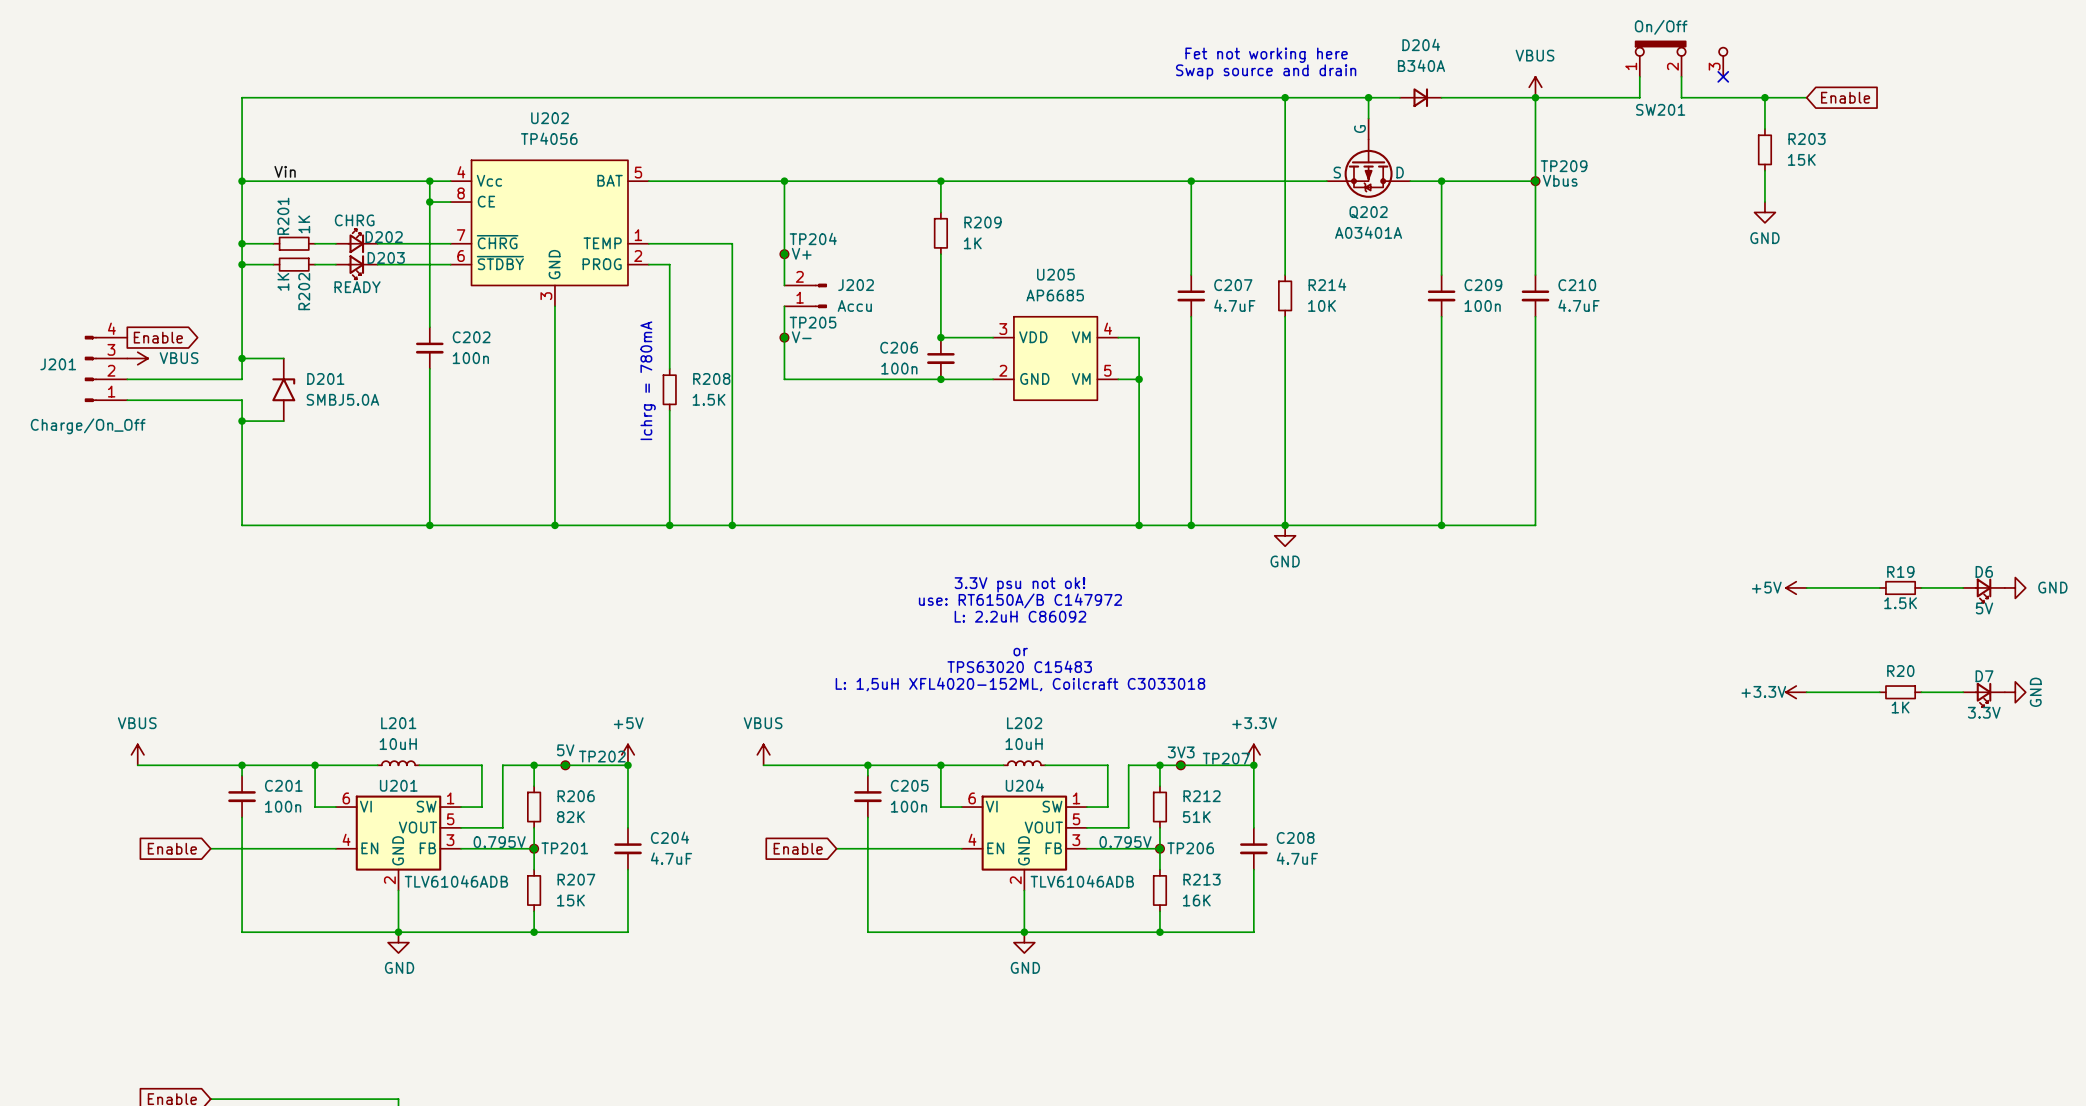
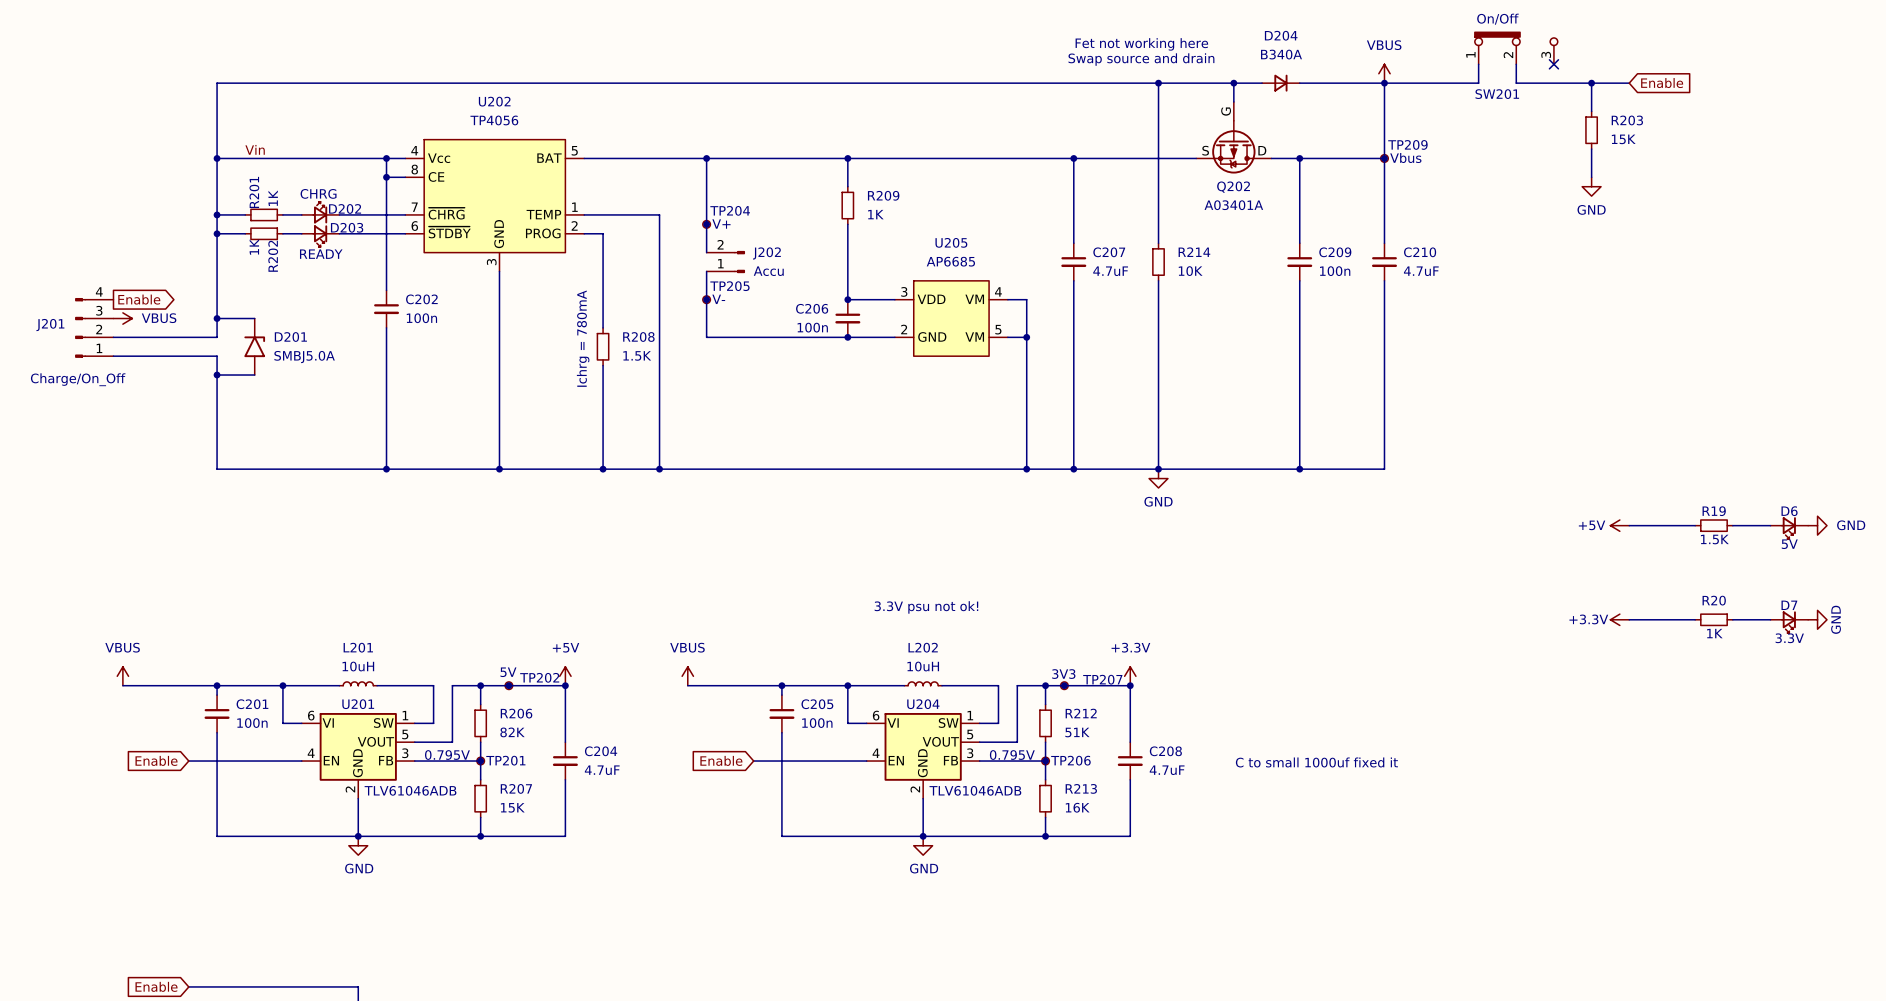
text position: 3.3V psu not ok! (1019, 584) -> 3.3V psu not ok! (926, 607)
text: use: RT6150A/B C147972 (1020, 600) -> none
text: L: 2.2uH C86092 (1020, 616) -> none
text: or (1020, 652) -> none
text: TPS63020 C15483 (1019, 666) -> none
text: L: 1,5uH XFL4020-152ML, Coilcraft C3033018 (1020, 684) -> none
text: none -> C to small 1000uf fixed it (1316, 762)

